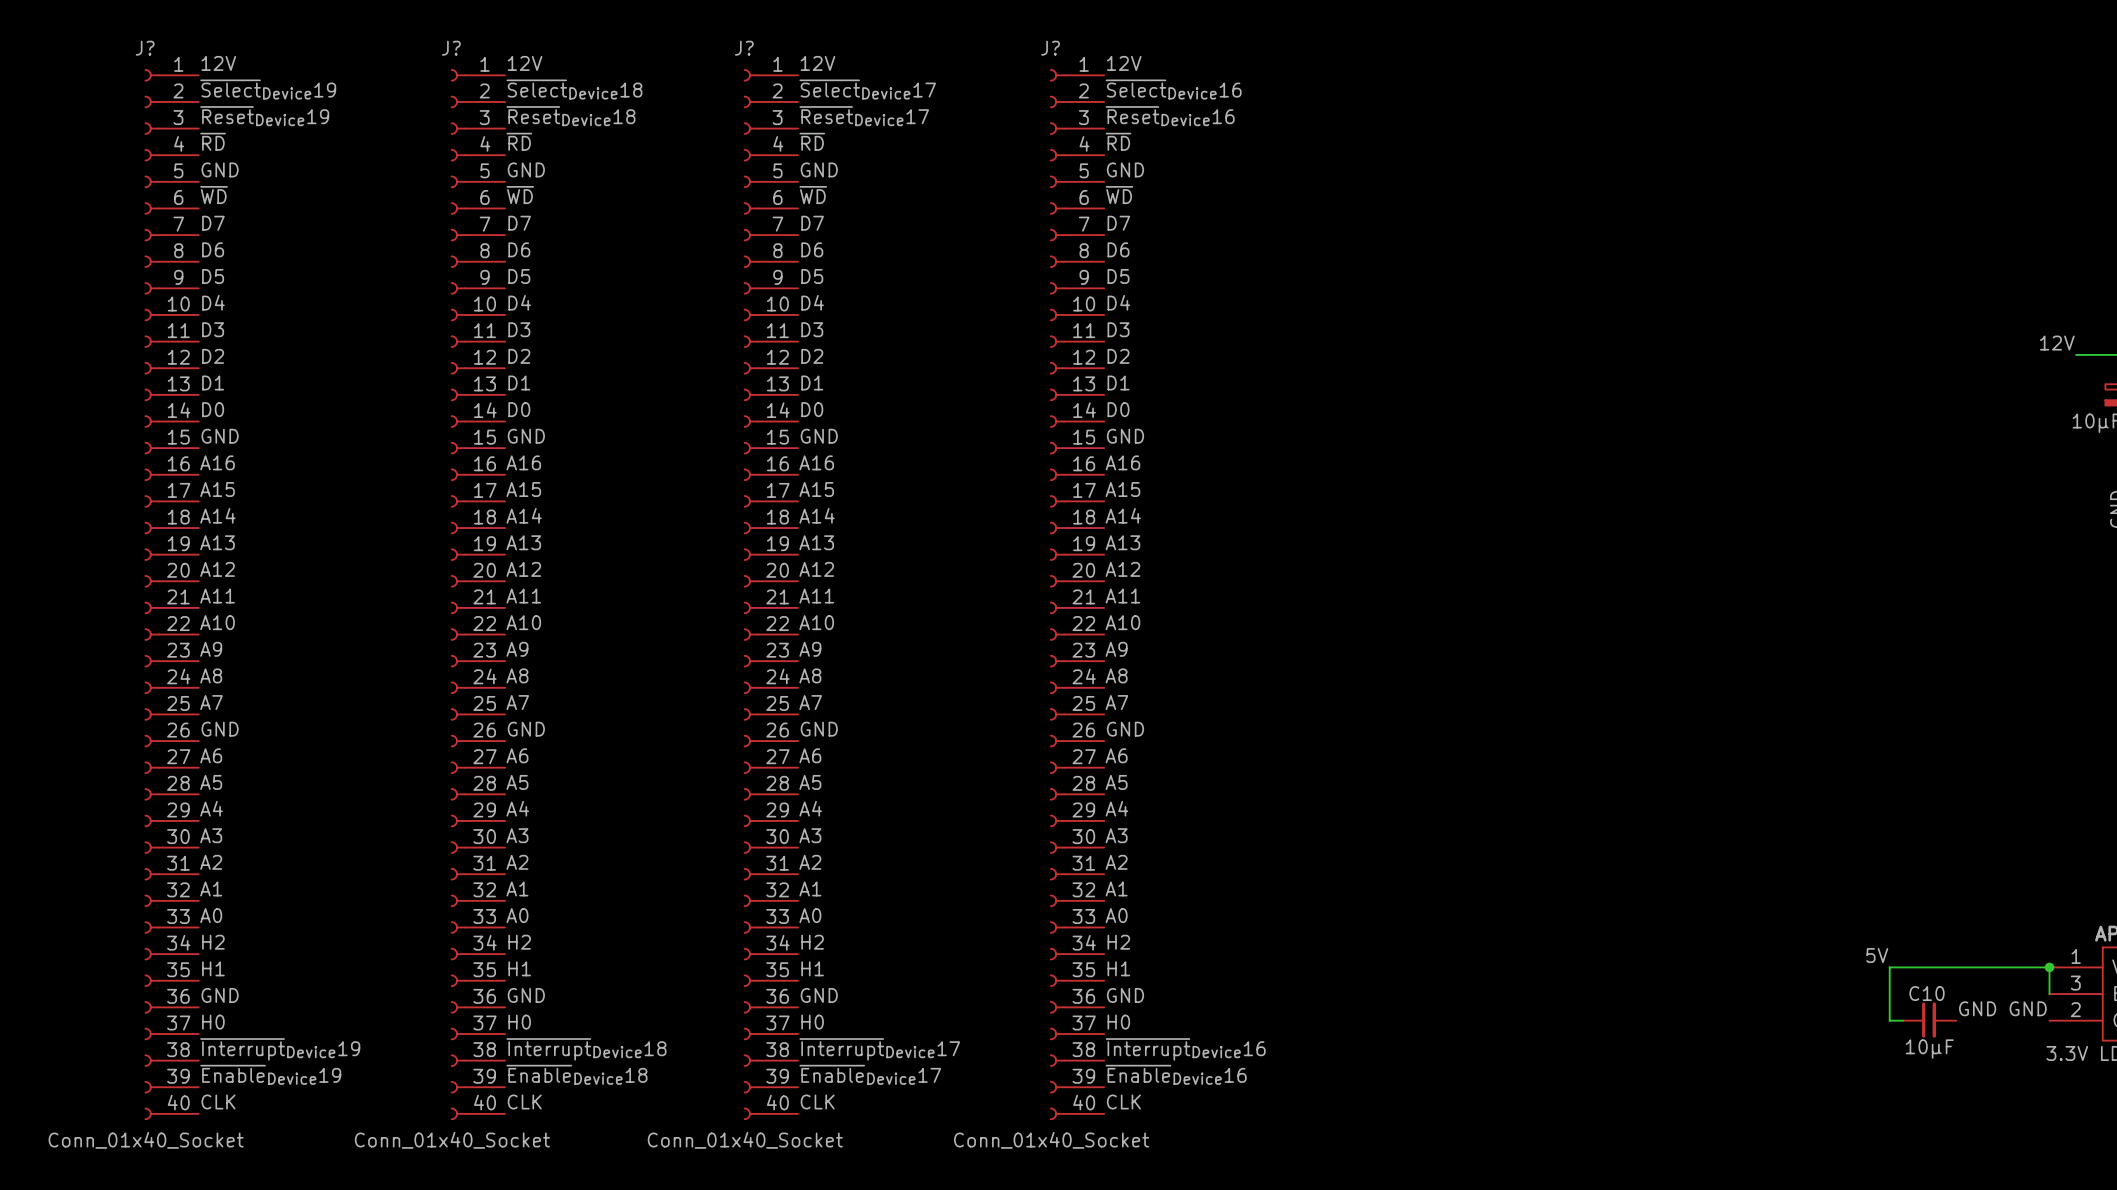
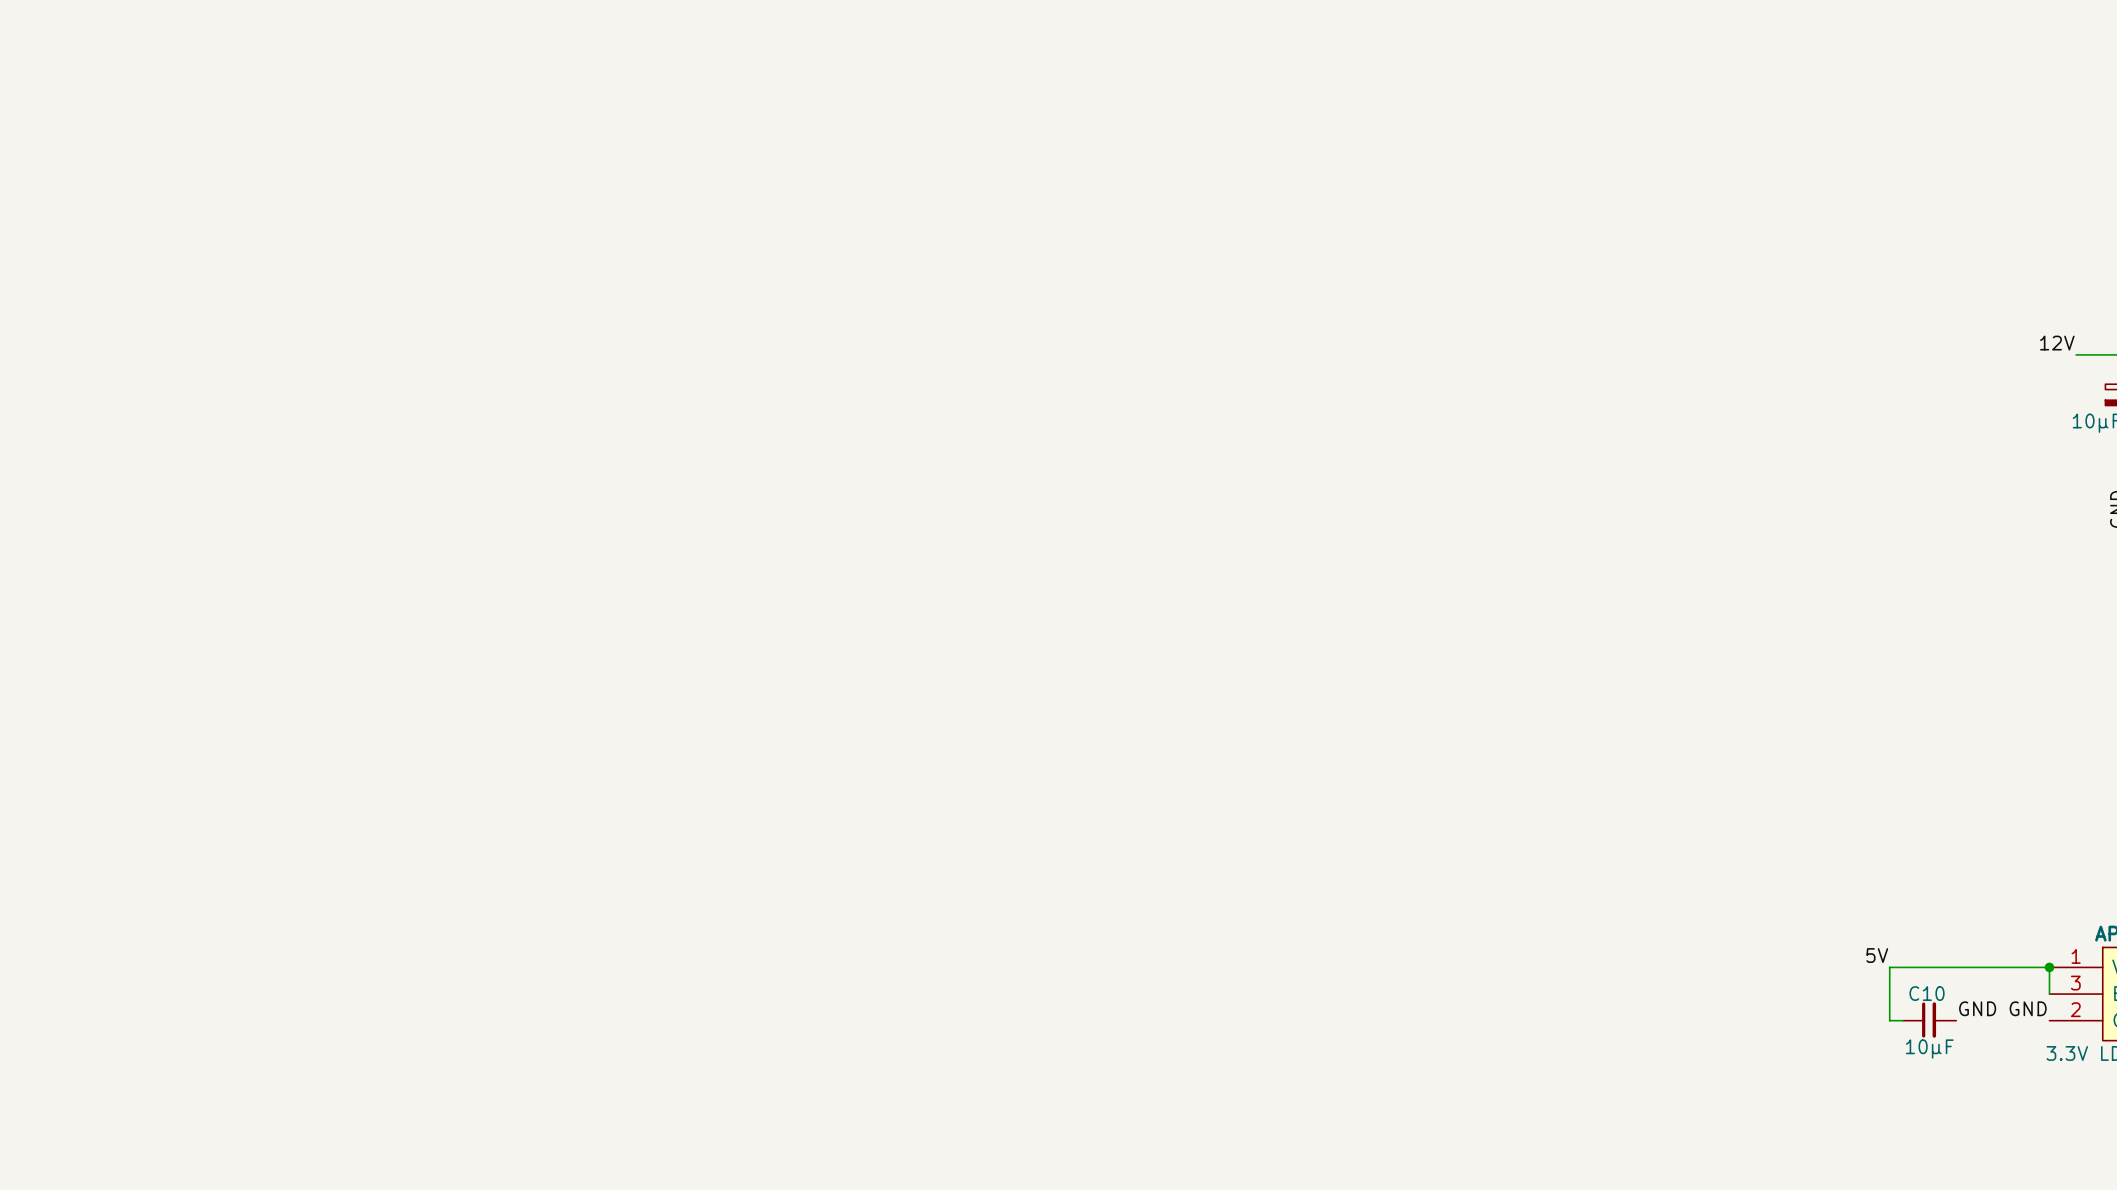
label: 12V (218, 63) -> none
label: 12V (525, 63) -> none
label: 12V (817, 63) -> none
label: 12V (1124, 63) -> none
label: ~{Select}Device19 (268, 89) -> none
label: ~{Select}Device18 (574, 89) -> none
label: ~{Select}Device17 (867, 89) -> none
label: ~{Select}Device16 (1173, 89) -> none
label: ~{Reset}Device19 (264, 116) -> none
label: ~{Reset}Device18 (570, 116) -> none
label: ~{Reset}Device17 (864, 116) -> none
label: ~{Reset}Device16 (1170, 116) -> none
label: ~{RD} (213, 141) -> none
label: ~{RD} (519, 141) -> none
label: ~{RD} (812, 141) -> none
label: ~{RD} (1118, 141) -> none
label: GND (220, 169) -> none
label: GND (526, 169) -> none
label: GND (819, 169) -> none
label: GND (1125, 169) -> none
label: ~{WD} (214, 195) -> none
label: ~{WD} (520, 195) -> none
label: ~{WD} (813, 195) -> none
label: ~{WD} (1119, 195) -> none
label: D7 (213, 223) -> none
label: D7 (519, 223) -> none
label: D7 (812, 223) -> none
label: D7 (1118, 223) -> none
label: D6 (213, 249) -> none
label: D6 (519, 249) -> none
label: D6 (812, 249) -> none
label: D6 (1118, 249) -> none
label: D5 (213, 276) -> none
label: D5 (519, 276) -> none
label: D5 (812, 276) -> none
label: D5 (1118, 276) -> none
label: D4 (213, 302) -> none
label: D4 (519, 302) -> none
label: D4 (812, 302) -> none
label: D4 (1118, 302) -> none
label: D3 (213, 329) -> none
label: D3 (519, 329) -> none
label: D3 (812, 329) -> none
label: D3 (1118, 329) -> none
label: D2 (213, 356) -> none
label: D2 (519, 356) -> none
label: D2 (812, 356) -> none
label: D2 (1118, 356) -> none
label: D1 (213, 382) -> none
label: D1 (519, 382) -> none
label: D1 (812, 382) -> none
label: D1 (1118, 382) -> none
label: D0 (213, 409) -> none
label: D0 (519, 409) -> none
label: D0 (812, 409) -> none
label: D0 (1118, 409) -> none
label: GND (220, 436) -> none
label: GND (526, 436) -> none
label: GND (819, 436) -> none
label: GND (1125, 436) -> none
label: A16 (217, 462) -> none
label: A16 (523, 462) -> none
label: A16 (816, 462) -> none
label: A16 (1122, 462) -> none
label: A15 (217, 489) -> none
label: A15 (523, 489) -> none
label: A15 (816, 489) -> none
label: A15 (1122, 489) -> none
label: A14 (217, 515) -> none
label: A14 (524, 515) -> none
label: A14 (817, 515) -> none
label: A14 (1123, 515) -> none
label: A13 (217, 542) -> none
label: A13 (523, 542) -> none
label: A13 (816, 542) -> none
label: A13 (1122, 542) -> none
label: A12 (217, 569) -> none
label: A12 (523, 569) -> none
label: A12 (816, 569) -> none
label: A12 (1122, 569) -> none
J?: Conn_01x40_Socket (171, 594) -> none
J?: Conn_01x40_Socket (477, 594) -> none
J?: Conn_01x40_Socket (770, 594) -> none
J?: Conn_01x40_Socket (1077, 594) -> none
label: A11 (217, 596) -> none
label: A11 (523, 596) -> none
label: A11 (816, 596) -> none
label: A11 (1122, 596) -> none
label: A10 (217, 622) -> none
label: A10 (523, 622) -> none
label: A10 (816, 622) -> none
label: A10 (1122, 622) -> none
label: A9 (211, 649) -> none
label: A9 (517, 649) -> none
label: A9 (810, 649) -> none
label: A9 (1116, 649) -> none
label: A8 (211, 675) -> none
label: A8 (517, 675) -> none
label: A8 (810, 675) -> none
label: A8 (1116, 675) -> none
label: A7 (211, 702) -> none
label: A7 (517, 702) -> none
label: A7 (810, 702) -> none
label: A7 (1116, 702) -> none
label: GND (220, 729) -> none
label: GND (526, 729) -> none
label: GND (819, 729) -> none
label: GND (1125, 729) -> none
label: A6 (211, 755) -> none
label: A6 (517, 755) -> none
label: A6 (810, 755) -> none
label: A6 (1116, 755) -> none
label: A5 (211, 782) -> none
label: A5 (517, 782) -> none
label: A5 (810, 782) -> none
label: A5 (1116, 782) -> none
label: A4 (211, 808) -> none
label: A4 (517, 808) -> none
label: A4 (810, 808) -> none
label: A4 (1116, 808) -> none
label: A3 (211, 835) -> none
label: A3 (517, 835) -> none
label: A3 (810, 835) -> none
label: A3 (1116, 835) -> none
label: A2 (211, 862) -> none
label: A2 (517, 862) -> none
label: A2 (810, 862) -> none
label: A2 (1116, 862) -> none
label: A1 (211, 888) -> none
label: A1 (517, 888) -> none
label: A1 (810, 888) -> none
label: A1 (1116, 888) -> none
label: A0 (211, 915) -> none
label: A0 (517, 915) -> none
label: A0 (810, 915) -> none
label: A0 (1116, 915) -> none
label: H2 (213, 942) -> none
label: H2 (519, 942) -> none
label: H2 (812, 942) -> none
label: H2 (1118, 942) -> none
label: H1 (213, 968) -> none
label: H1 (519, 968) -> none
label: H1 (812, 968) -> none
label: H1 (1118, 968) -> none
label: GND (220, 995) -> none
label: GND (526, 995) -> none
label: GND (819, 995) -> none
label: GND (1125, 995) -> none
label: H0 (213, 1022) -> none
label: H0 (519, 1022) -> none
label: H0 (812, 1022) -> none
label: H0 (1118, 1022) -> none
label: ~{Interrupt}Device19 (280, 1049) -> none
label: ~{Interrupt}Device18 (586, 1049) -> none
label: ~{Interrupt}Device17 (879, 1049) -> none
label: ~{Interrupt}Device16 (1185, 1049) -> none
label: ~{Enable}Device19 (270, 1074) -> none
label: ~{Enable}Device18 (577, 1074) -> none
label: ~{Enable}Device17 (870, 1074) -> none
label: ~{Enable}Device16 (1176, 1074) -> none
label: CLK (218, 1102) -> none
label: CLK (524, 1102) -> none
label: CLK (817, 1102) -> none
label: CLK (1123, 1102) -> none

